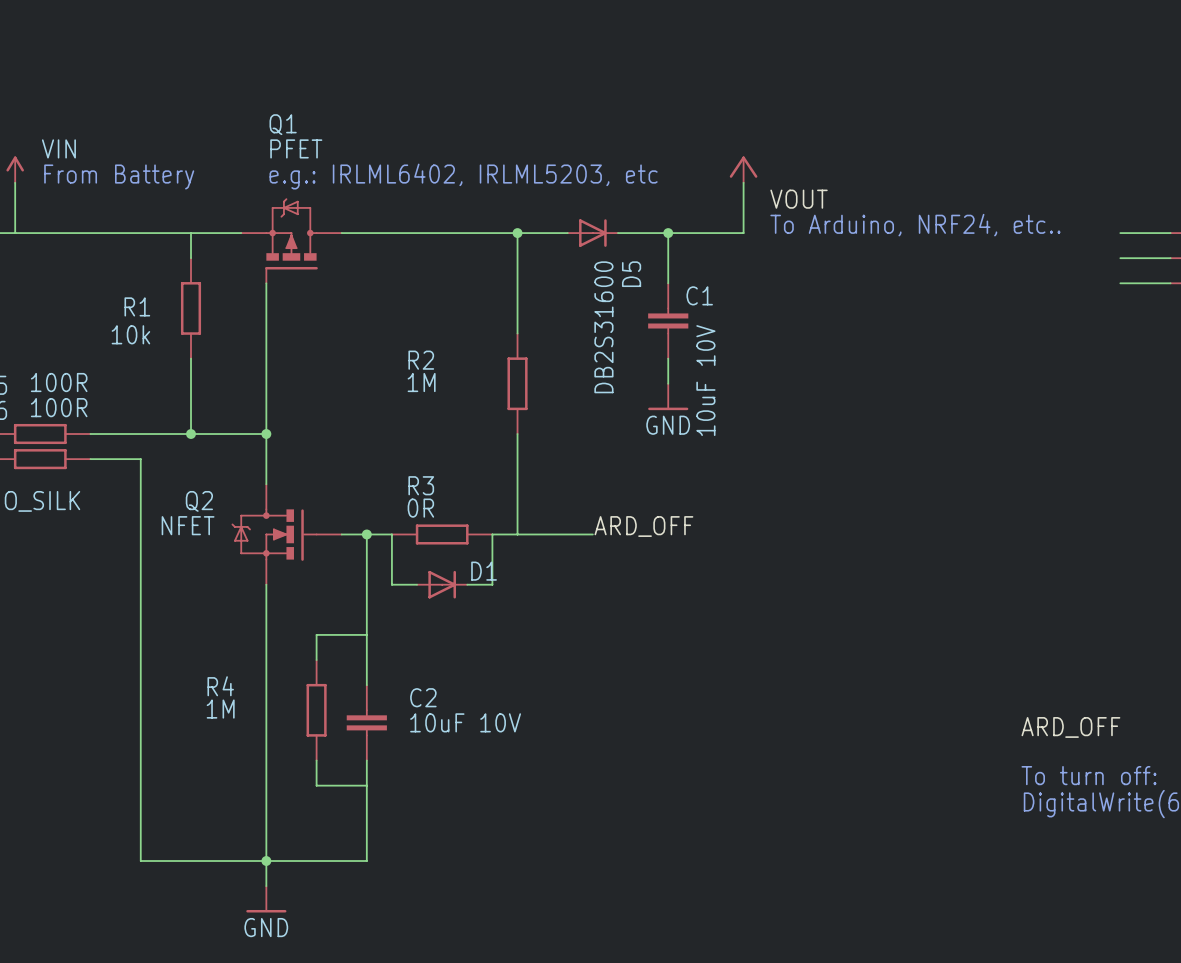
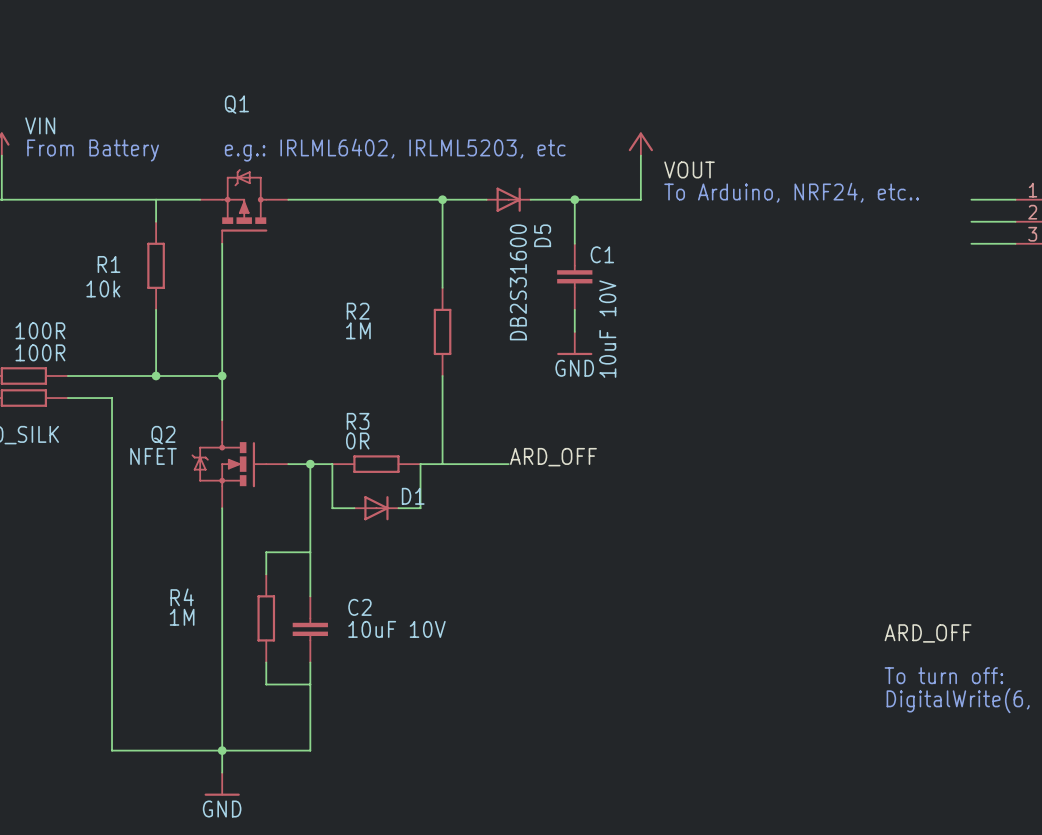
Q1 value: PFET (296, 148) -> none

